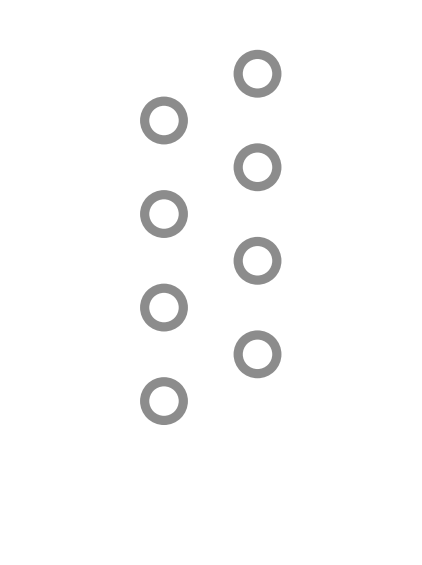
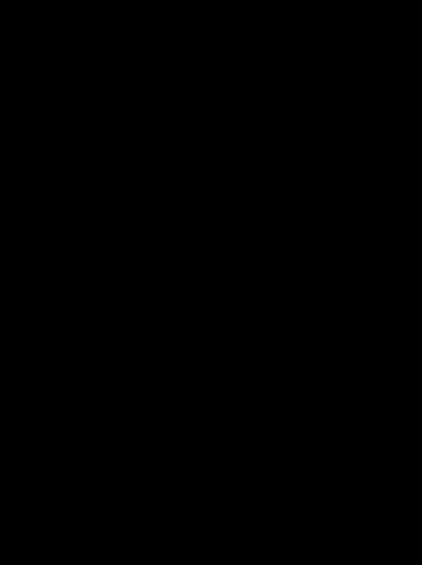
part: (210, 237) -> none

